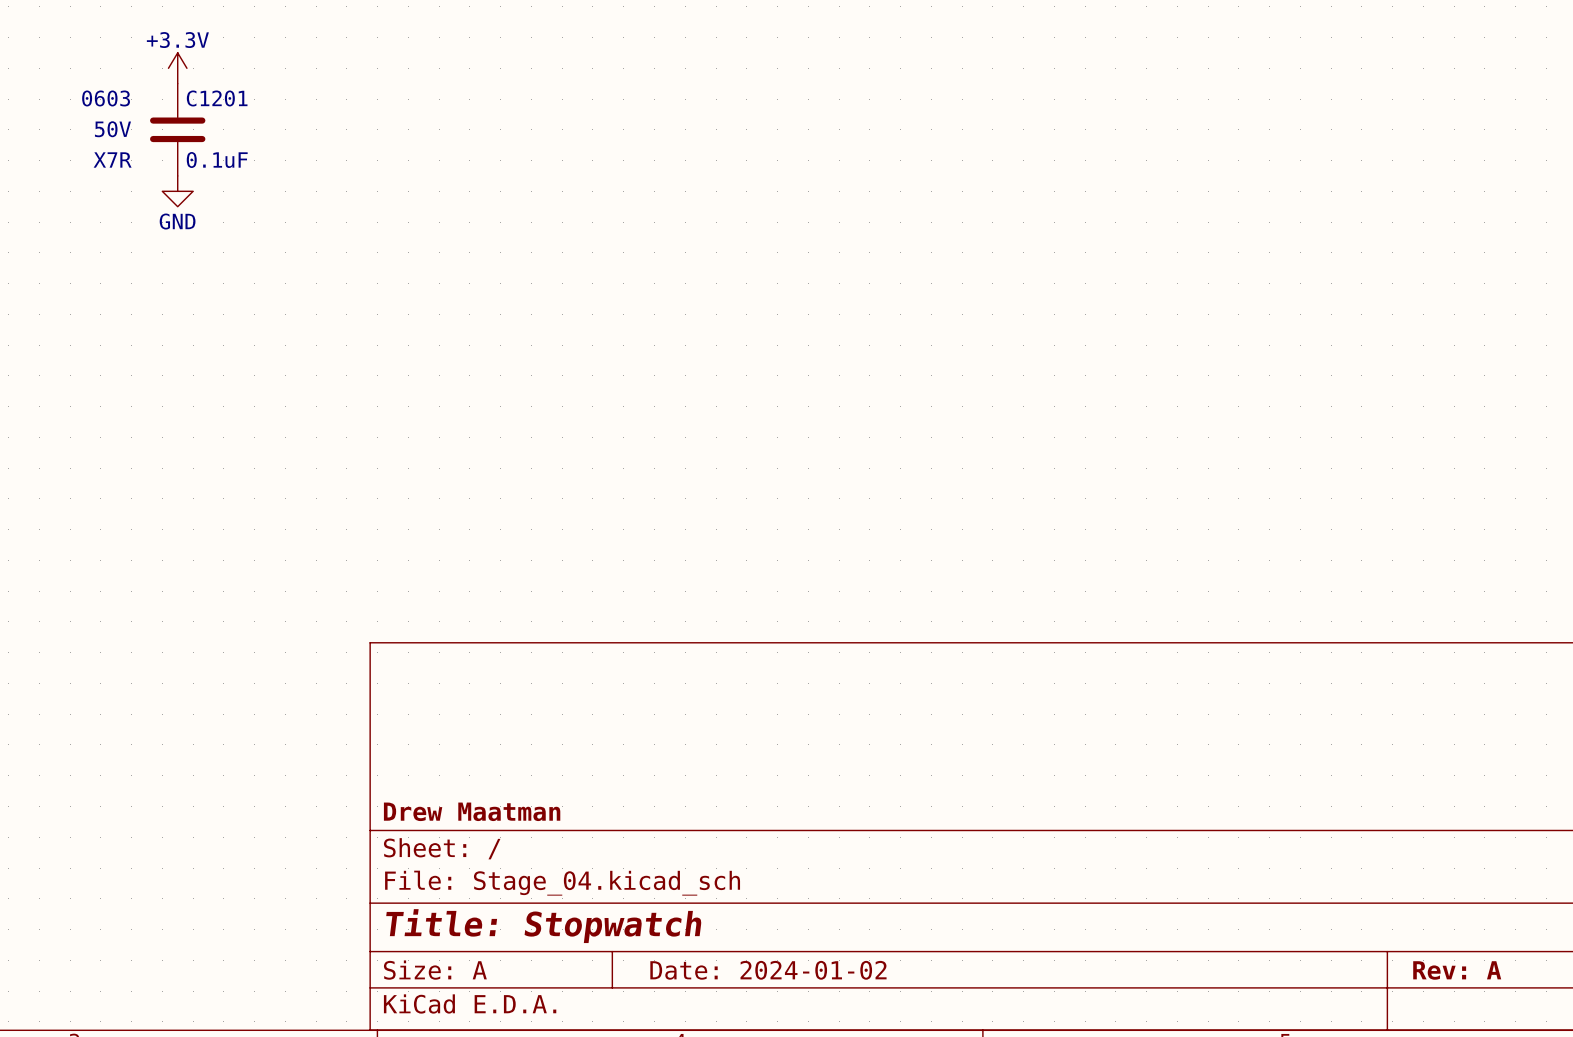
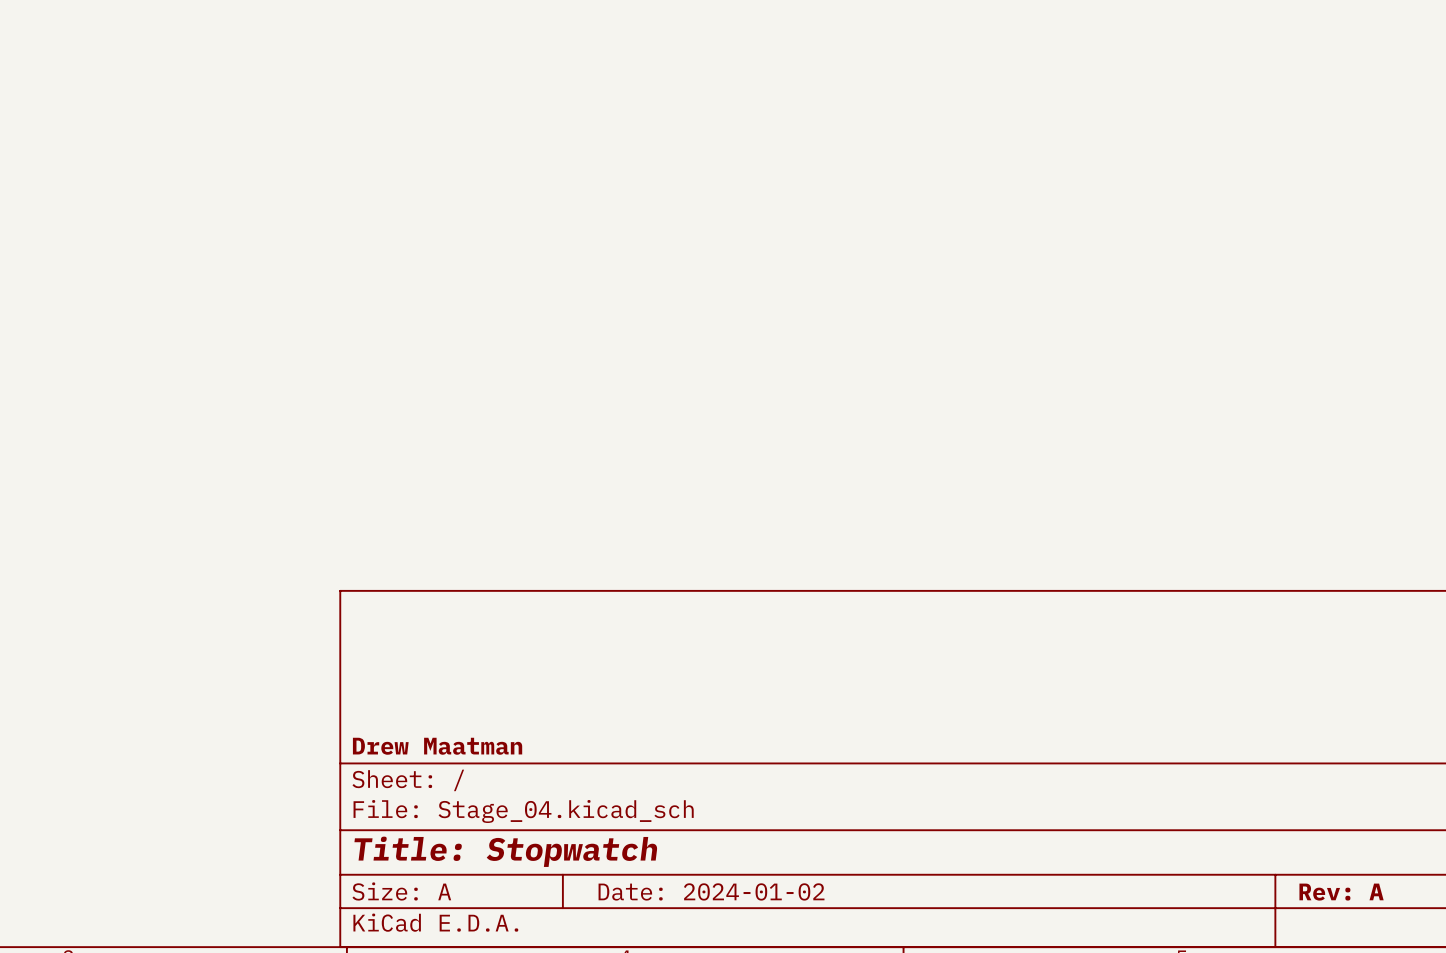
power symbol: +3.3V (177, 68) -> none
C1201: 0.1uF (177, 129) -> none
power symbol: GND (177, 191) -> none

